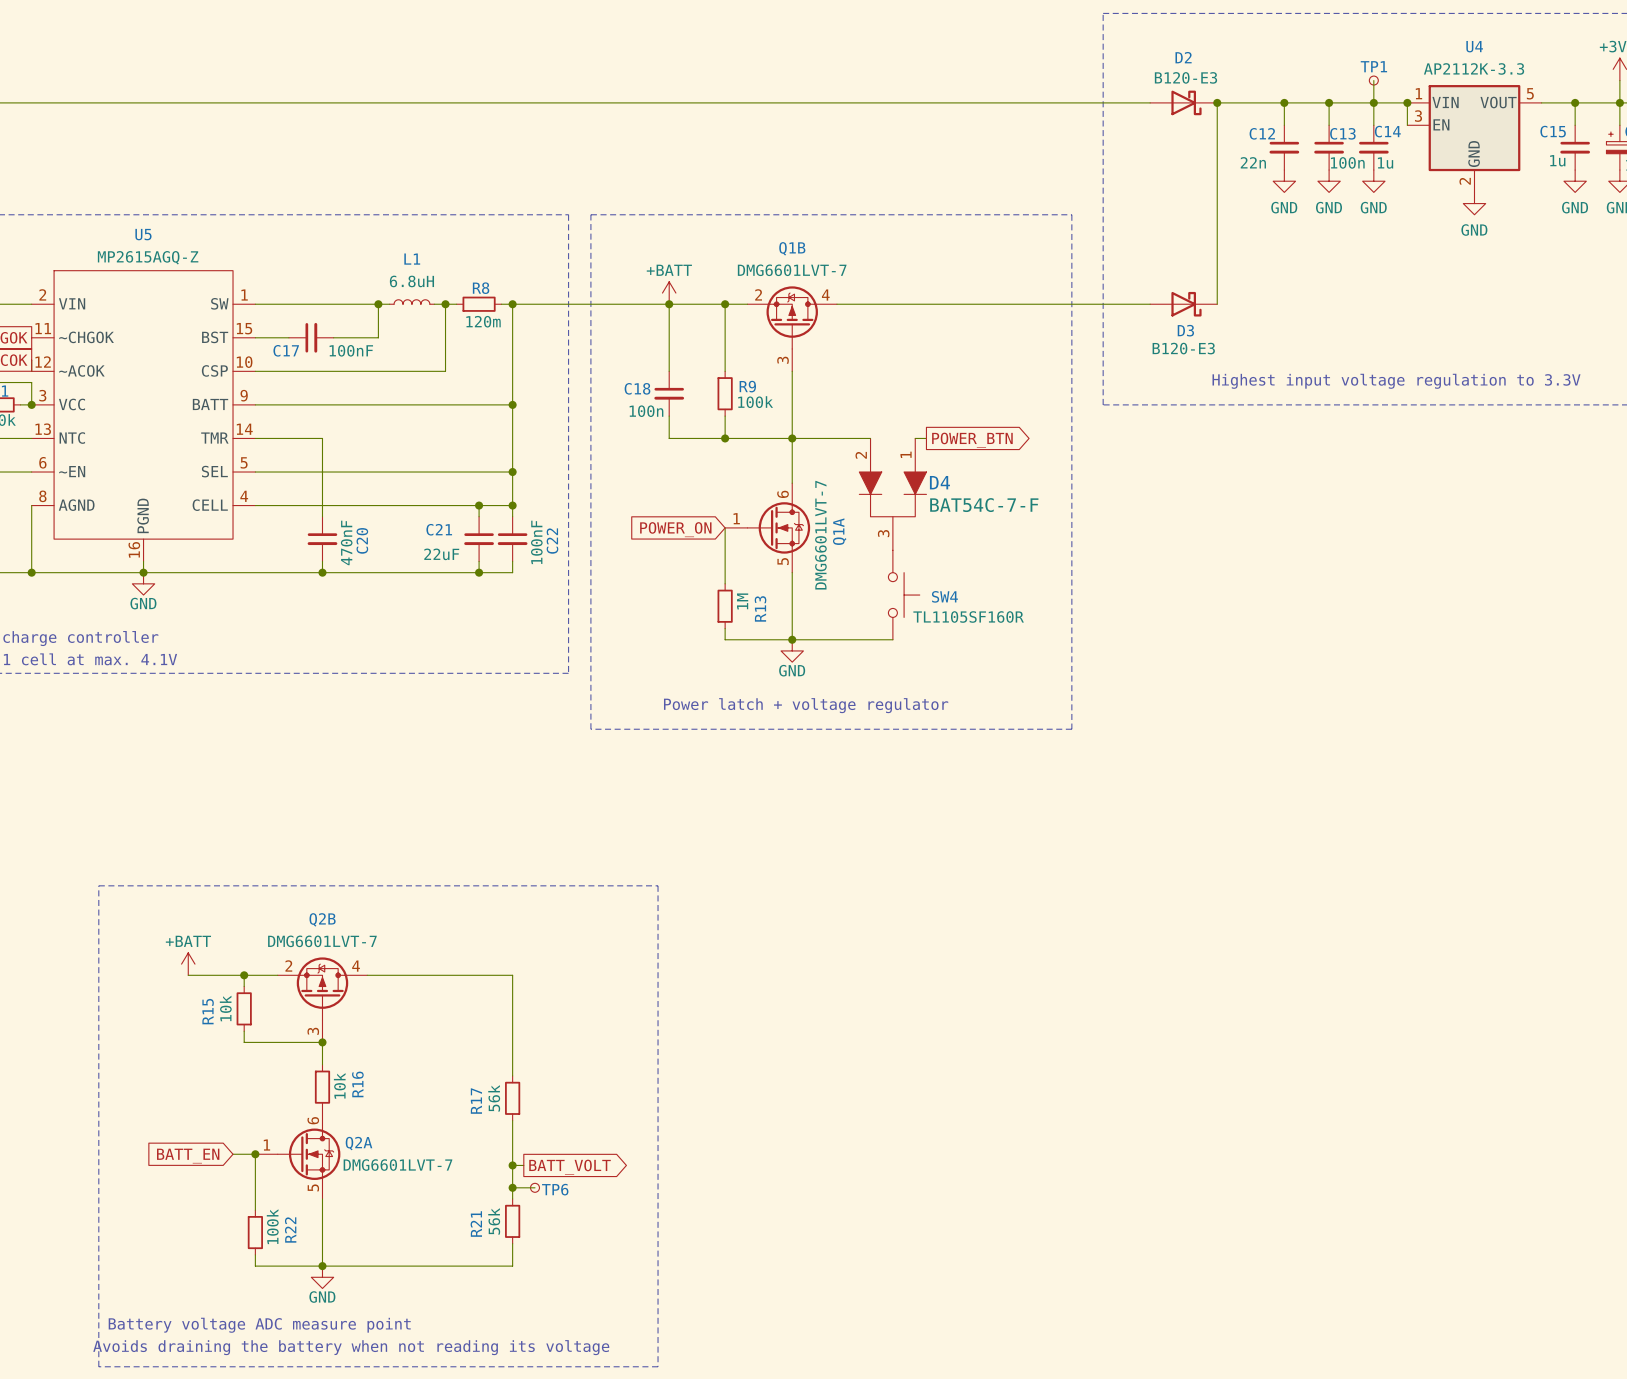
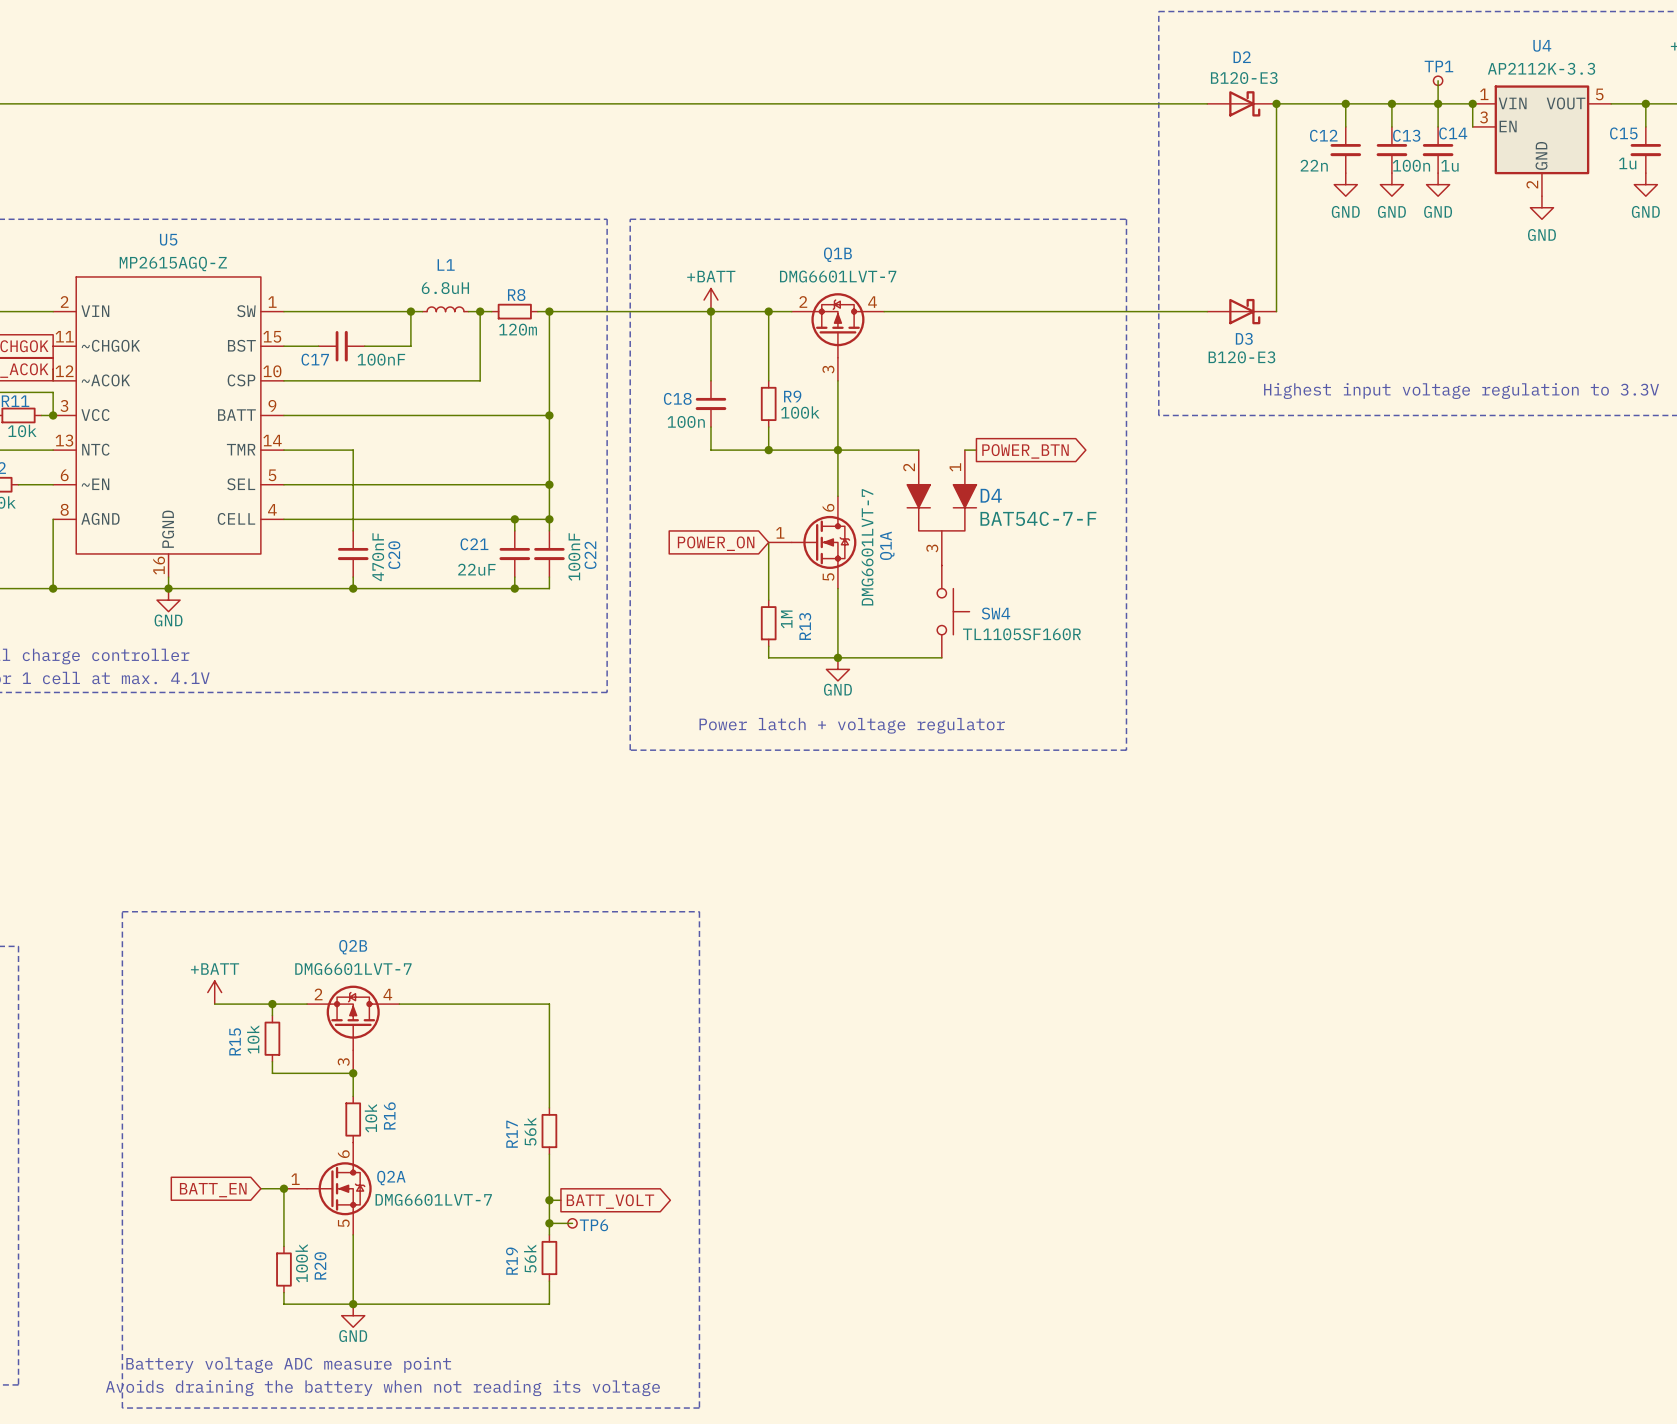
R21 name: R21 (476, 1224) -> R19 (511, 1261)
R22 name: R22 (290, 1230) -> R20 (320, 1265)

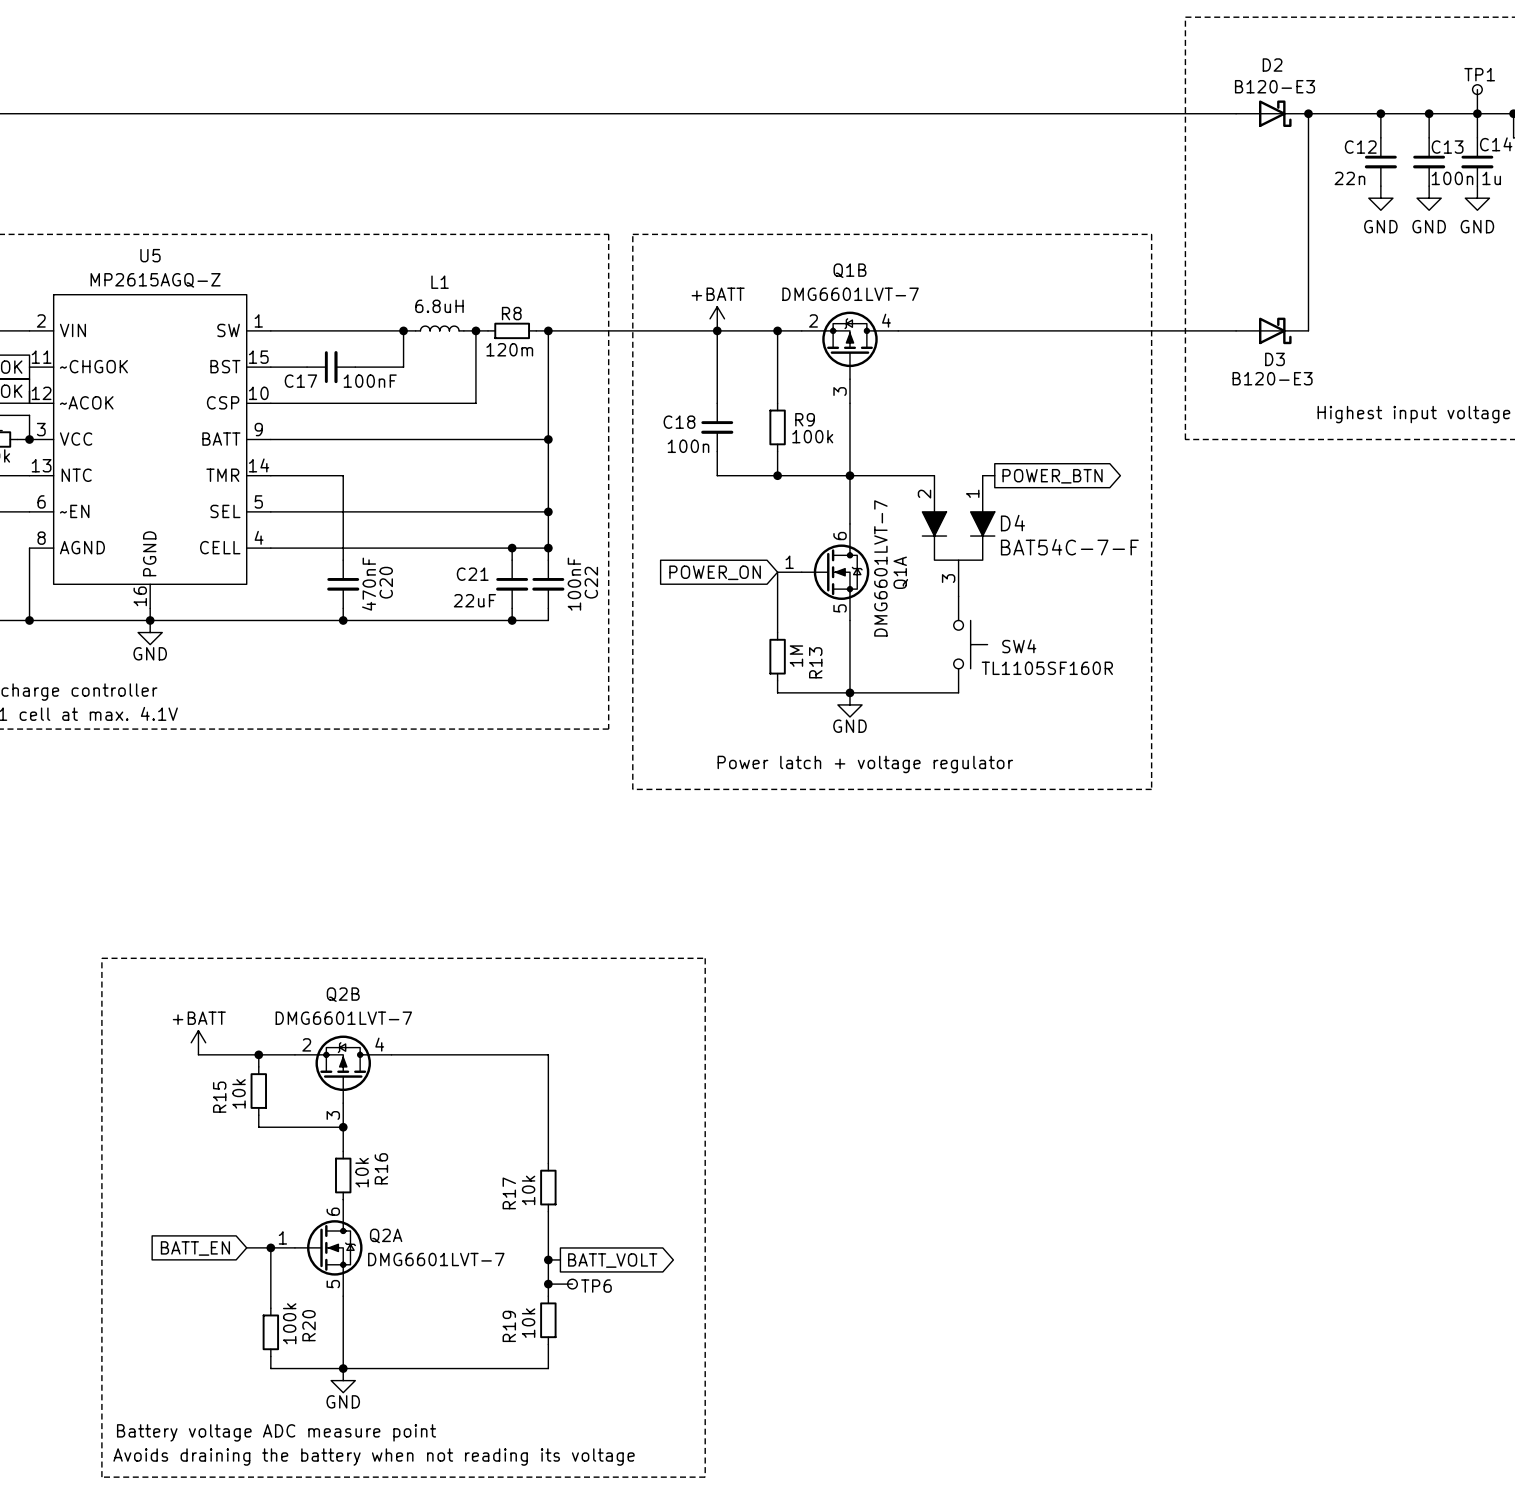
R17 value: 56k (530, 1131) -> 10k (528, 1190)
R19 value: 56k (530, 1258) -> 10k (528, 1323)

